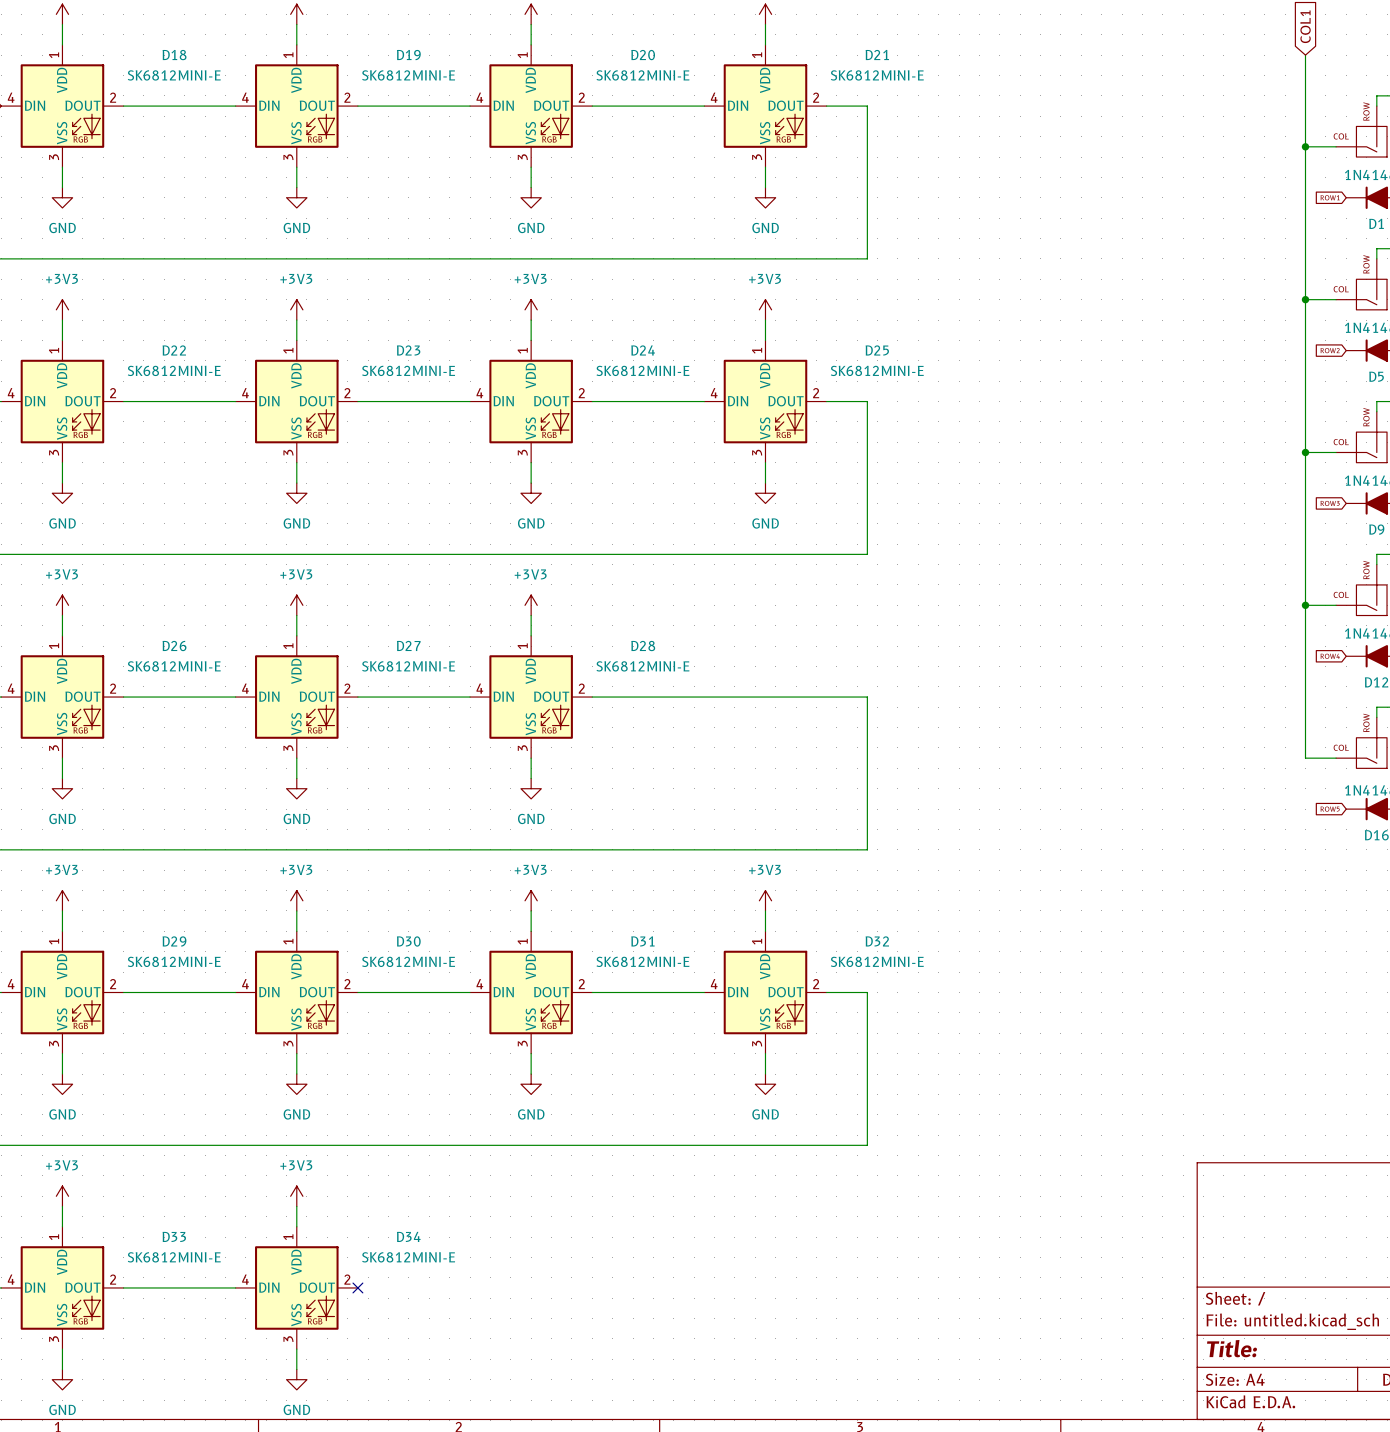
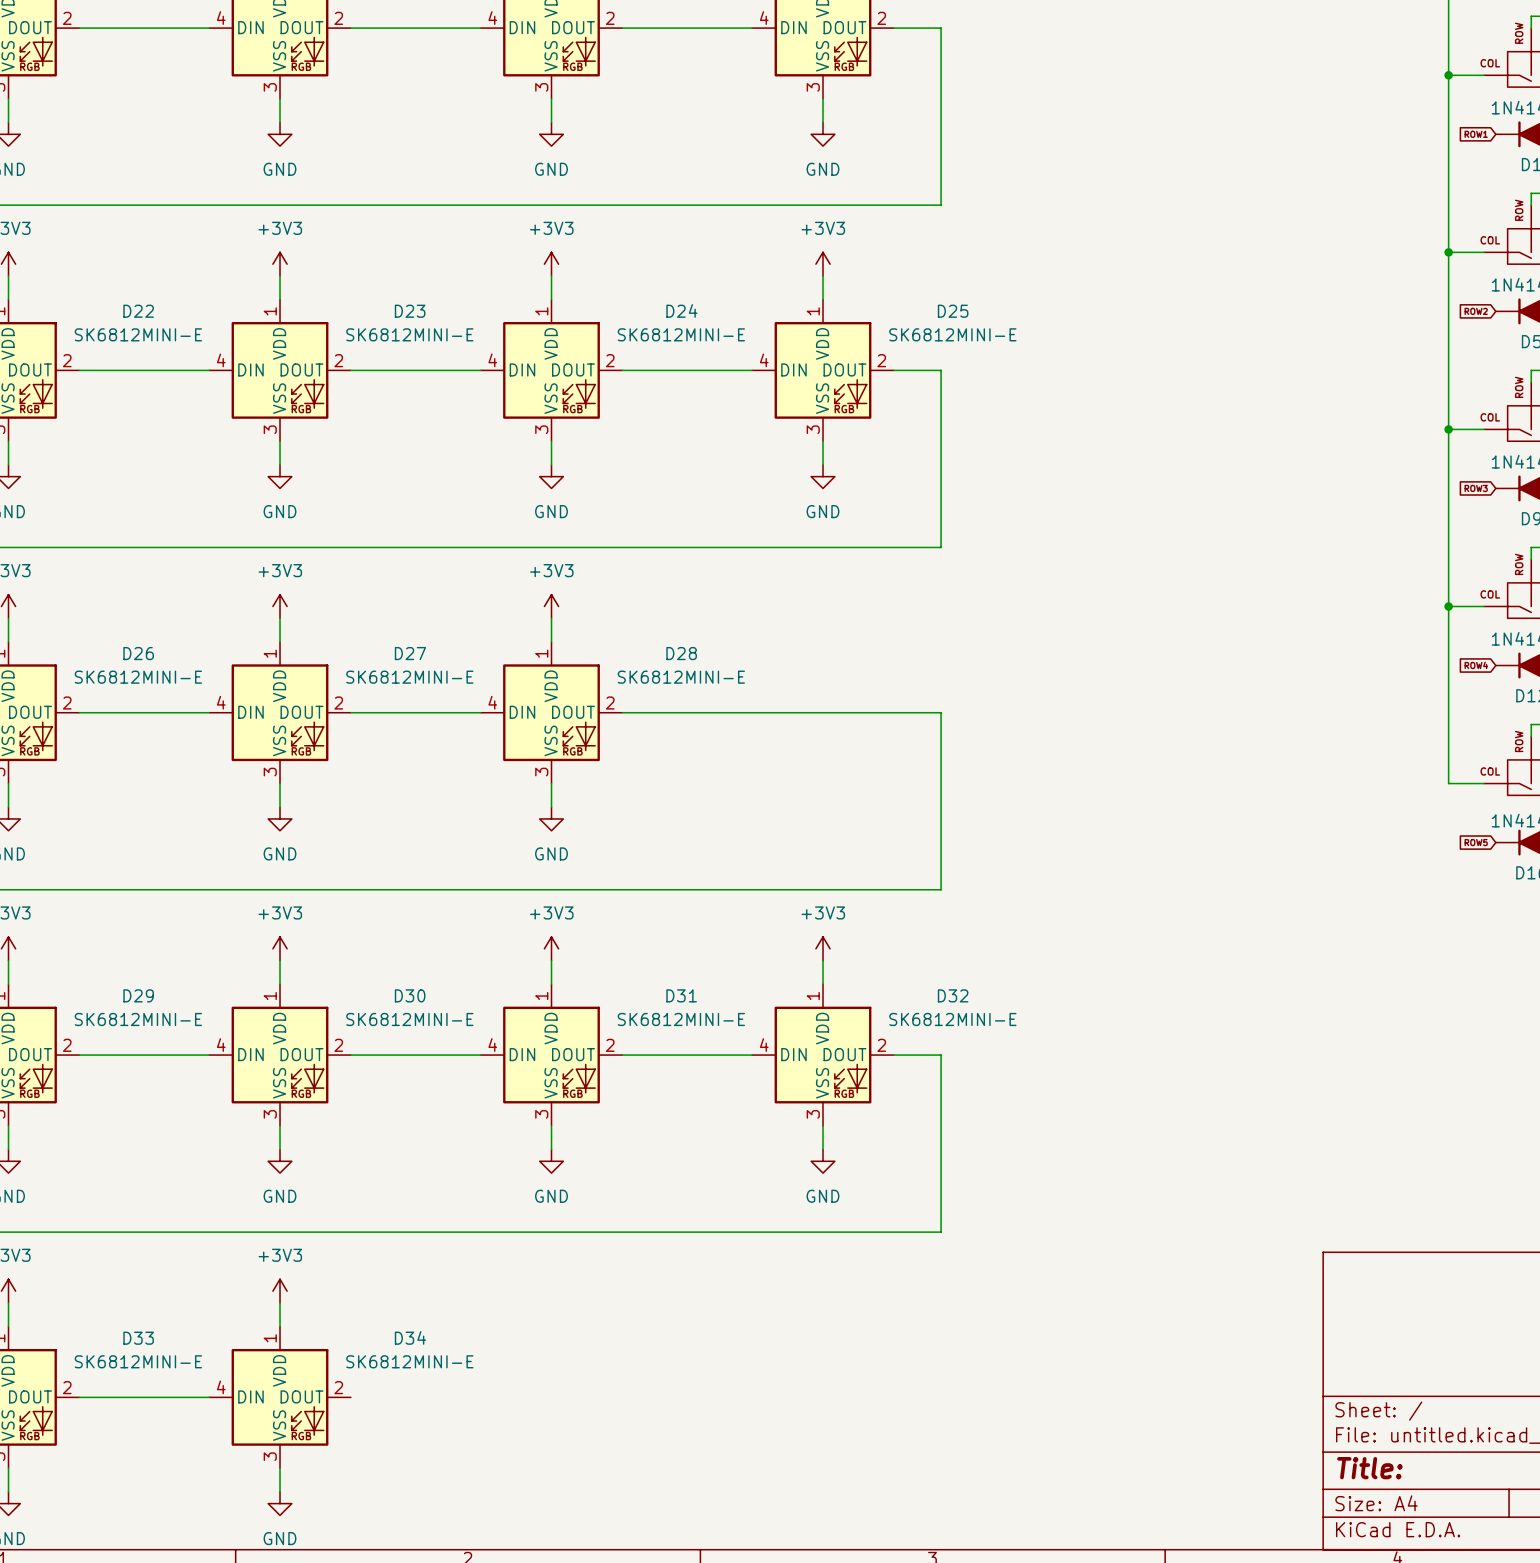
no-connect mark: (357, 1287) -> none

